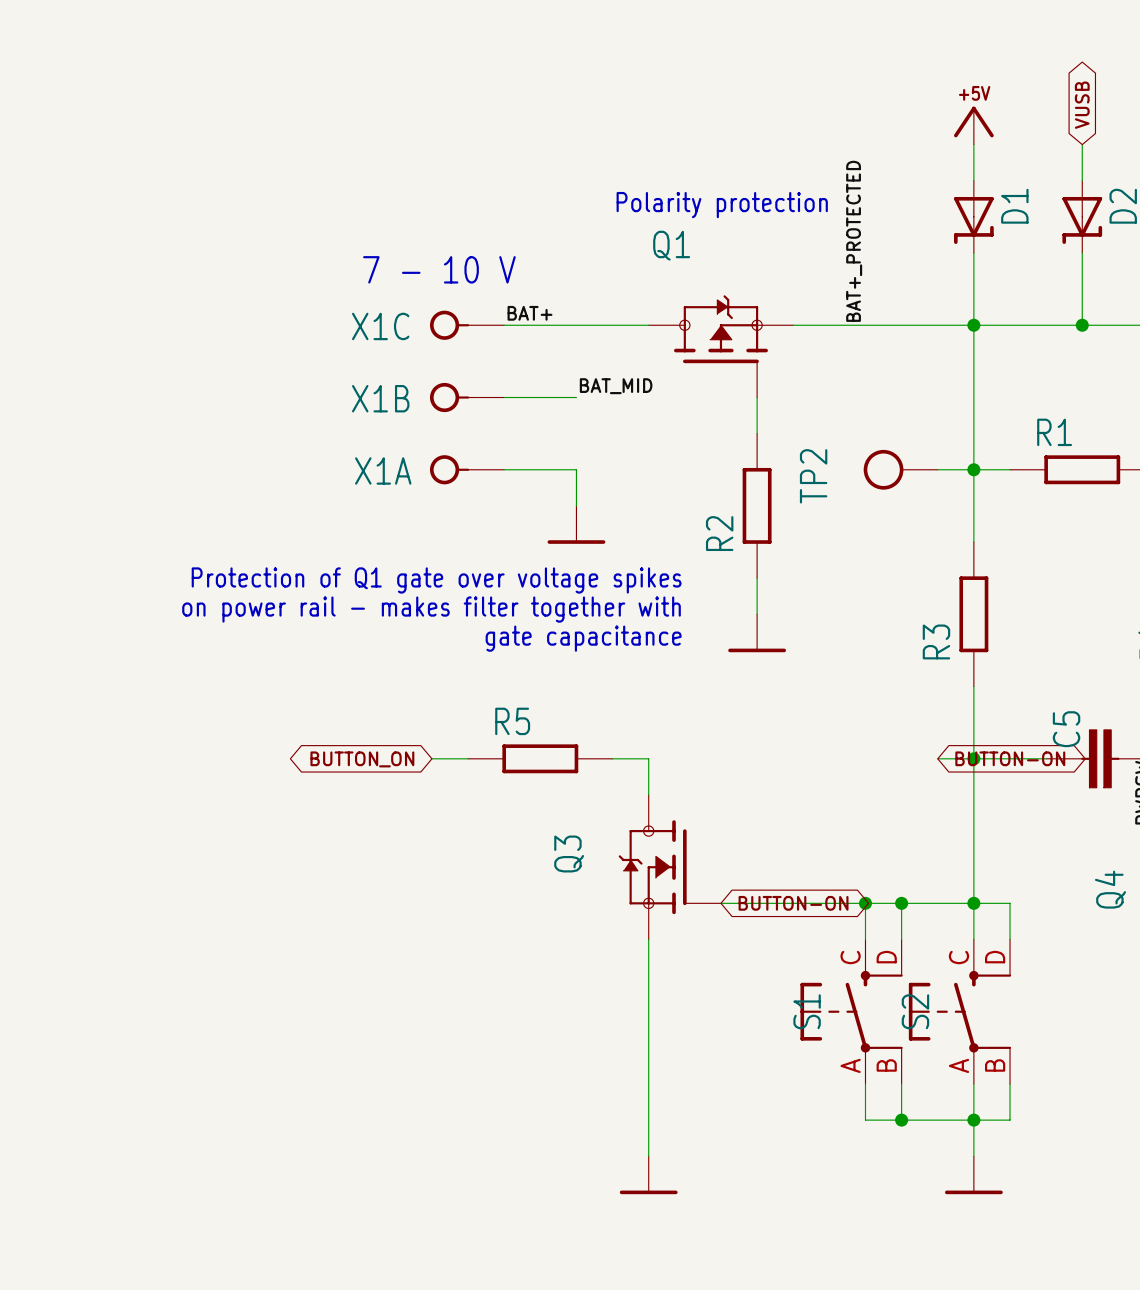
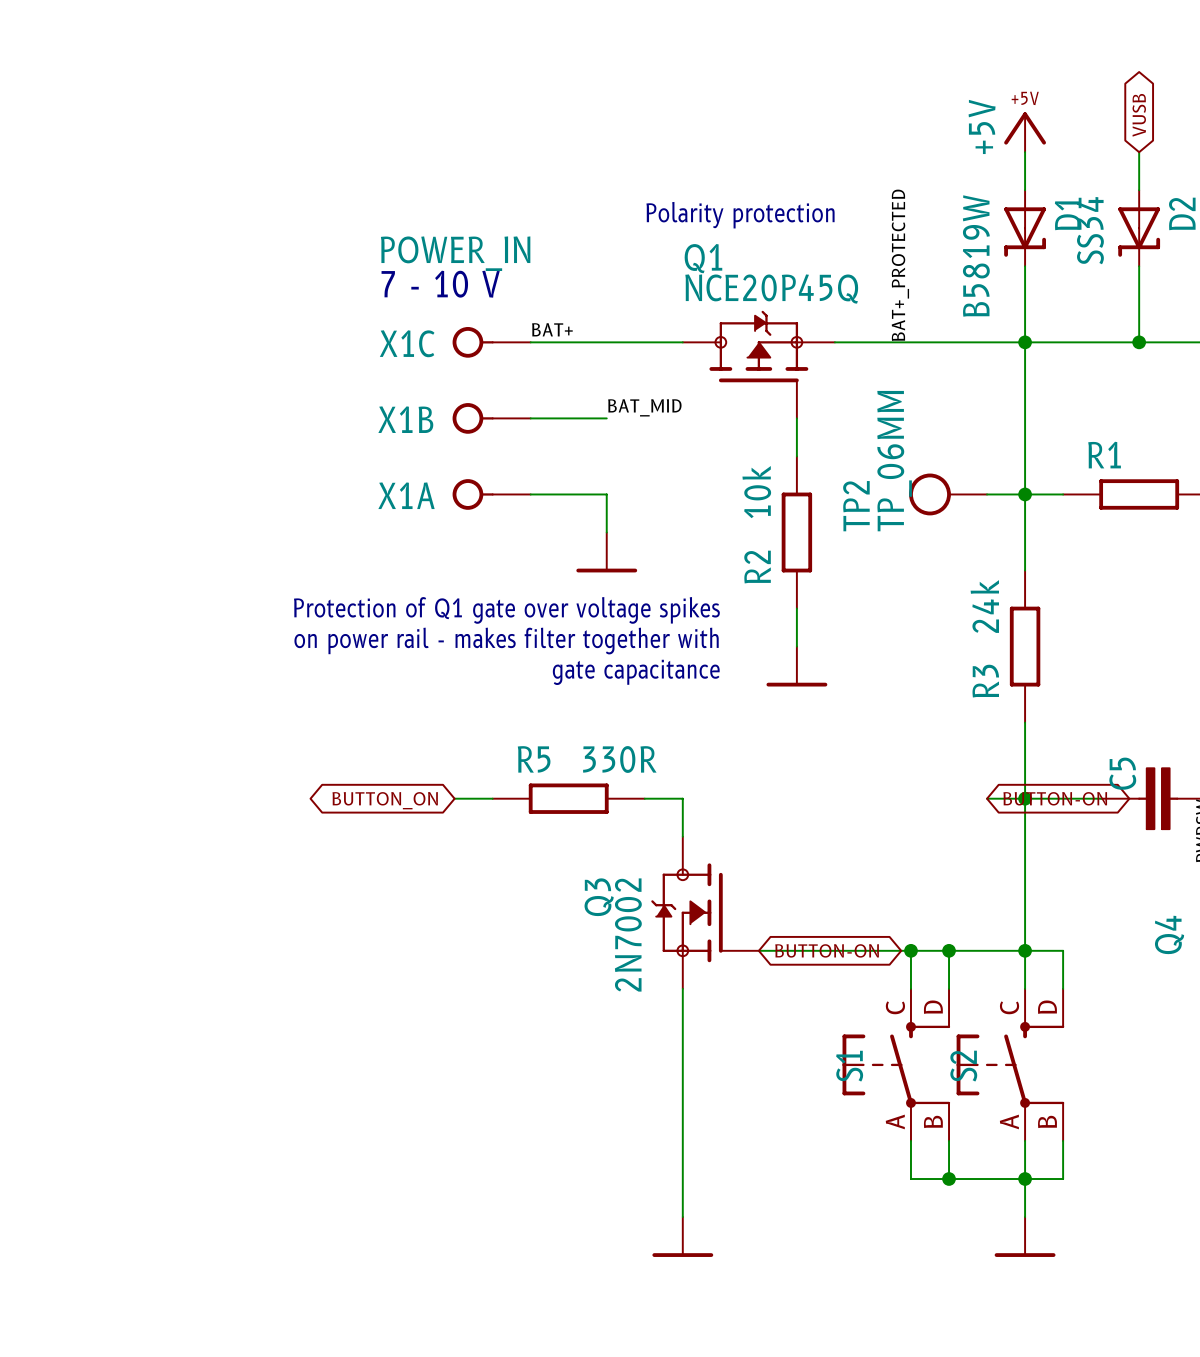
power symbol text: none -> +5V (982, 126)
D2 value: none -> SS34 (1090, 230)
X1B value: none -> POWER_IN (455, 253)
D1 value: none -> B5819W (976, 256)
Q1 value: none -> NCE20P45Q (771, 289)
TP2 value: none -> TP_06MM (894, 461)
R2 value: none -> 10k (756, 492)
R3 value: none -> 24k (984, 606)
R5 value: none -> 330R (619, 759)
Q3 value: none -> 2N7002 (628, 934)

